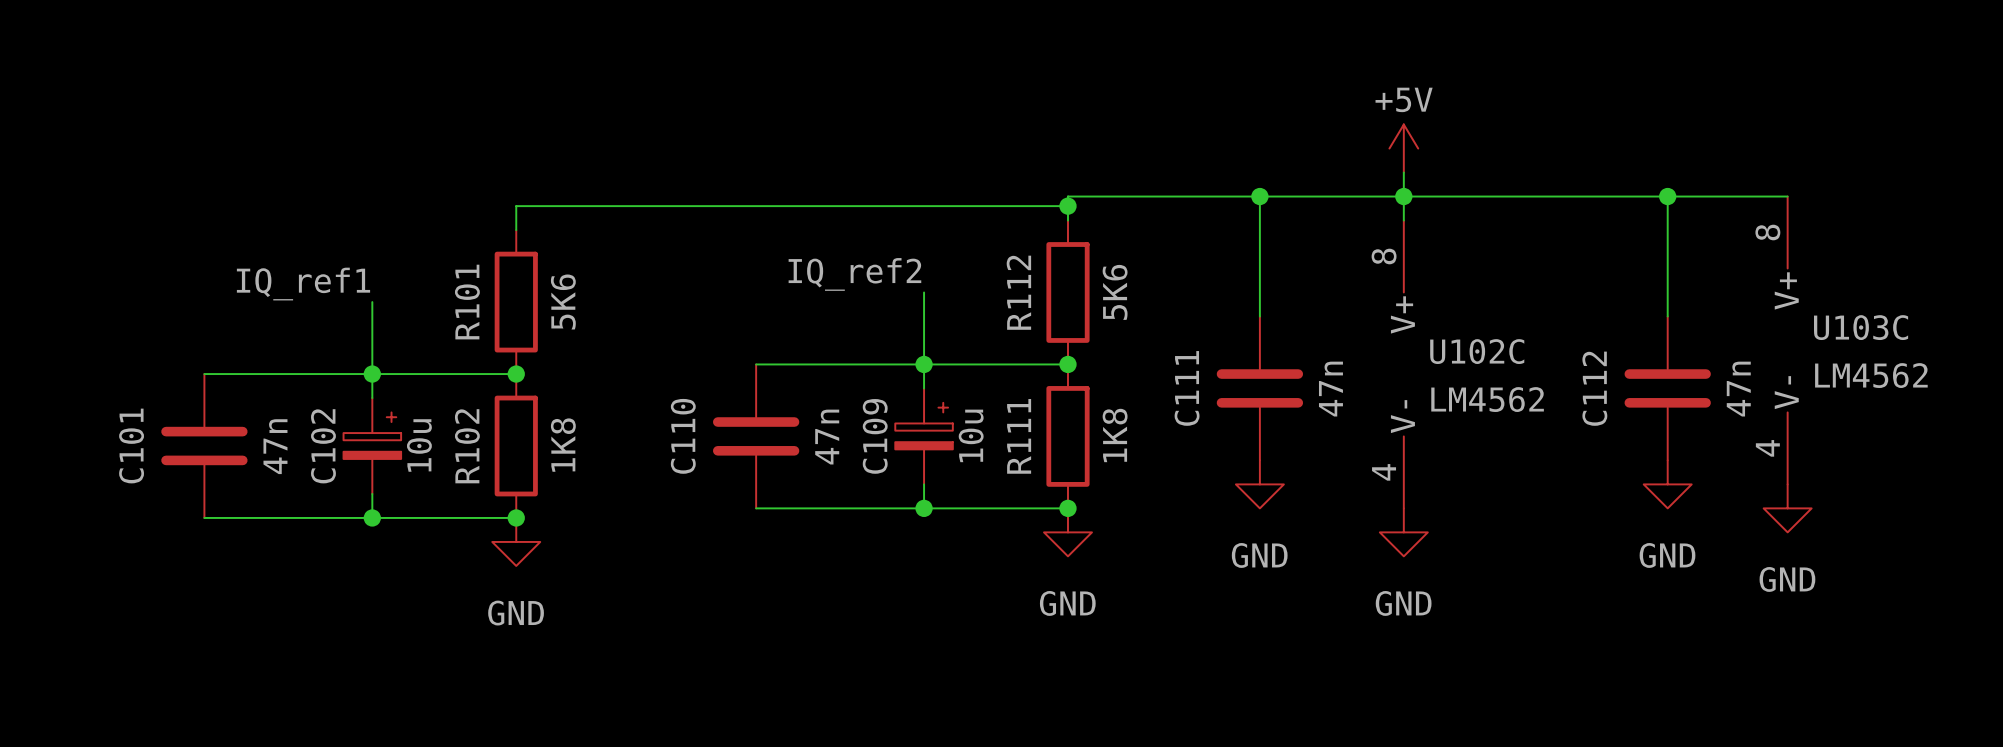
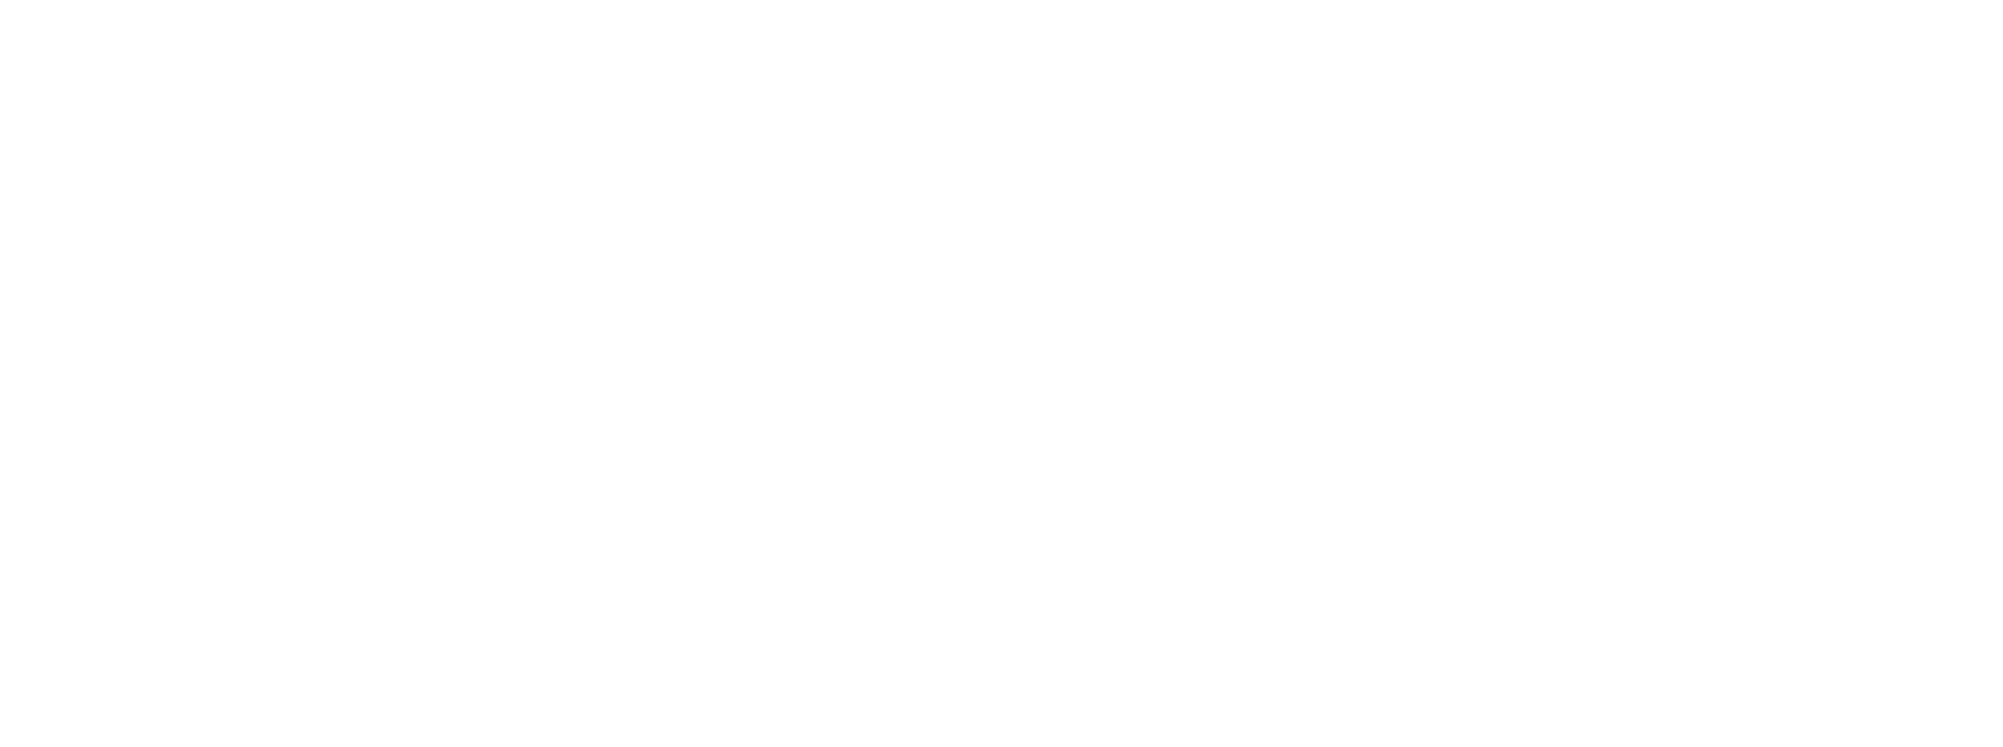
power symbol: +5V (1403, 148) -> none
wire: (1403, 172) (1403, 220) -> none
wire: (1259, 196) (1259, 316) -> none
junction: (1259, 196) -> none
junction: (1403, 196) -> none
wire: (1667, 196) (1667, 316) -> none
junction: (1667, 196) -> none
wire: (1787, 196) (1067, 196) (1067, 220) -> none
wire: (1067, 206) (516, 206) (516, 230) -> none
junction: (1067, 206) -> none
label: IQ_ref2 (854, 274) -> none
label: IQ_ref1 (303, 284) -> none
wire: (924, 292) (924, 388) -> none
R112: 5K6 (1067, 292) -> none
wire: (372, 302) (372, 398) -> none
R101: 5K6 (516, 302) -> none
U103C: LM4562 (1787, 340) -> none
wire: (756, 364) (1067, 364) -> none
junction: (924, 364) -> none
junction: (1067, 364) -> none
U102C: LM4562 (1403, 364) -> none
wire: (204, 374) (516, 374) -> none
junction: (372, 374) -> none
junction: (516, 374) -> none
C111: 47n (1259, 388) -> none
C112: 47n (1667, 388) -> none
C110: 47n (756, 436) -> none
C109: 10u (924, 436) -> none
R111: 1K8 (1067, 436) -> none
C101: 47n (204, 446) -> none
C102: 10u (372, 446) -> none
R102: 1K8 (516, 446) -> none
wire: (924, 484) (924, 508) -> none
power symbol: GND (1259, 484) -> none
power symbol: GND (1667, 484) -> none
wire: (372, 493) (372, 517) -> none
wire: (756, 508) (1067, 508) -> none
junction: (924, 508) -> none
junction: (1067, 508) -> none
power symbol: GND (1787, 508) -> none
wire: (204, 517) (516, 517) -> none
junction: (372, 517) -> none
junction: (516, 517) -> none
power symbol: GND (1067, 532) -> none
power symbol: GND (1403, 532) -> none
power symbol: GND (516, 541) -> none

